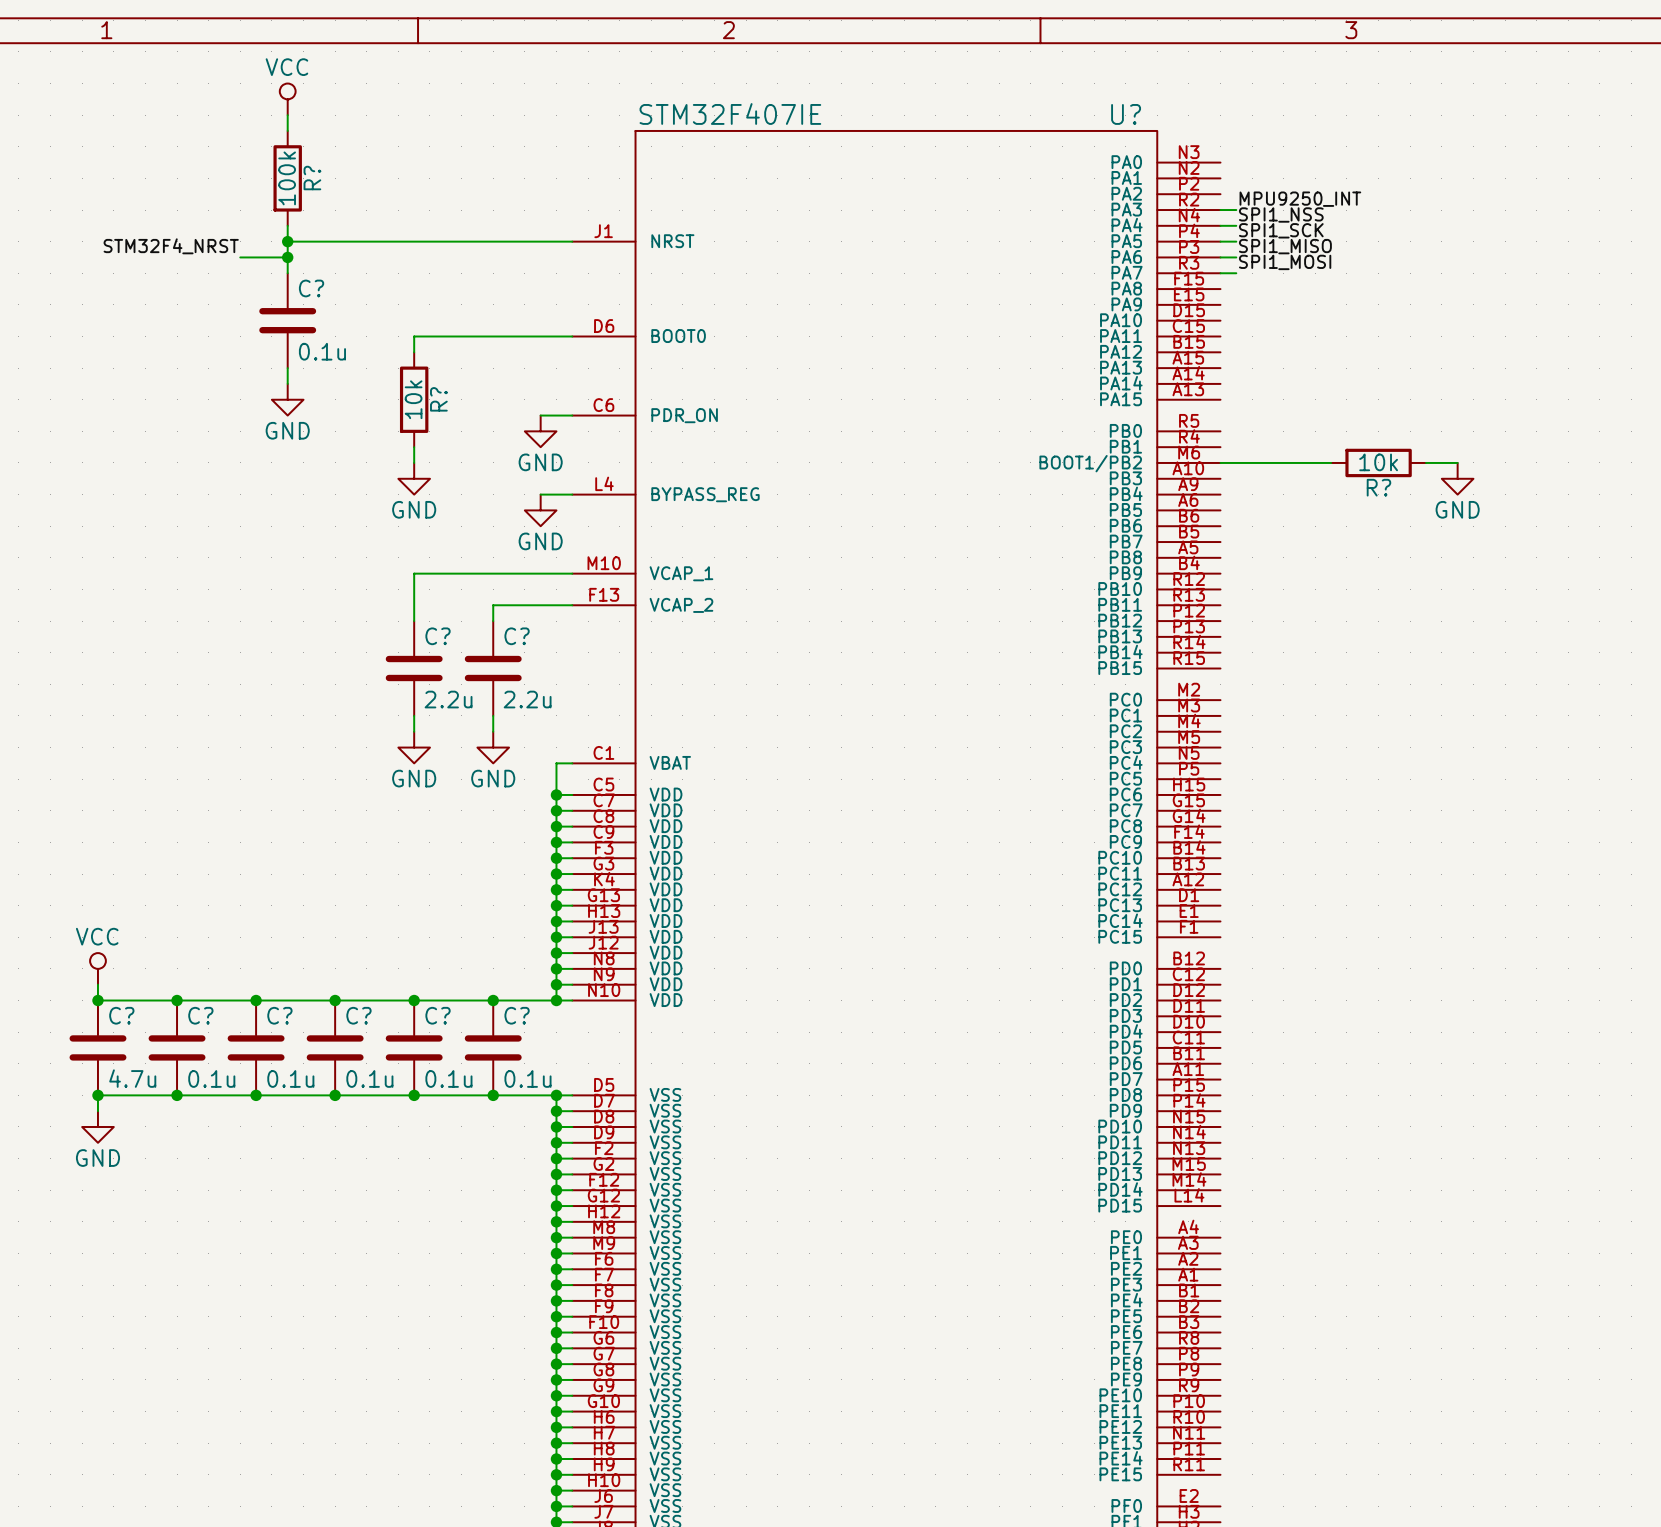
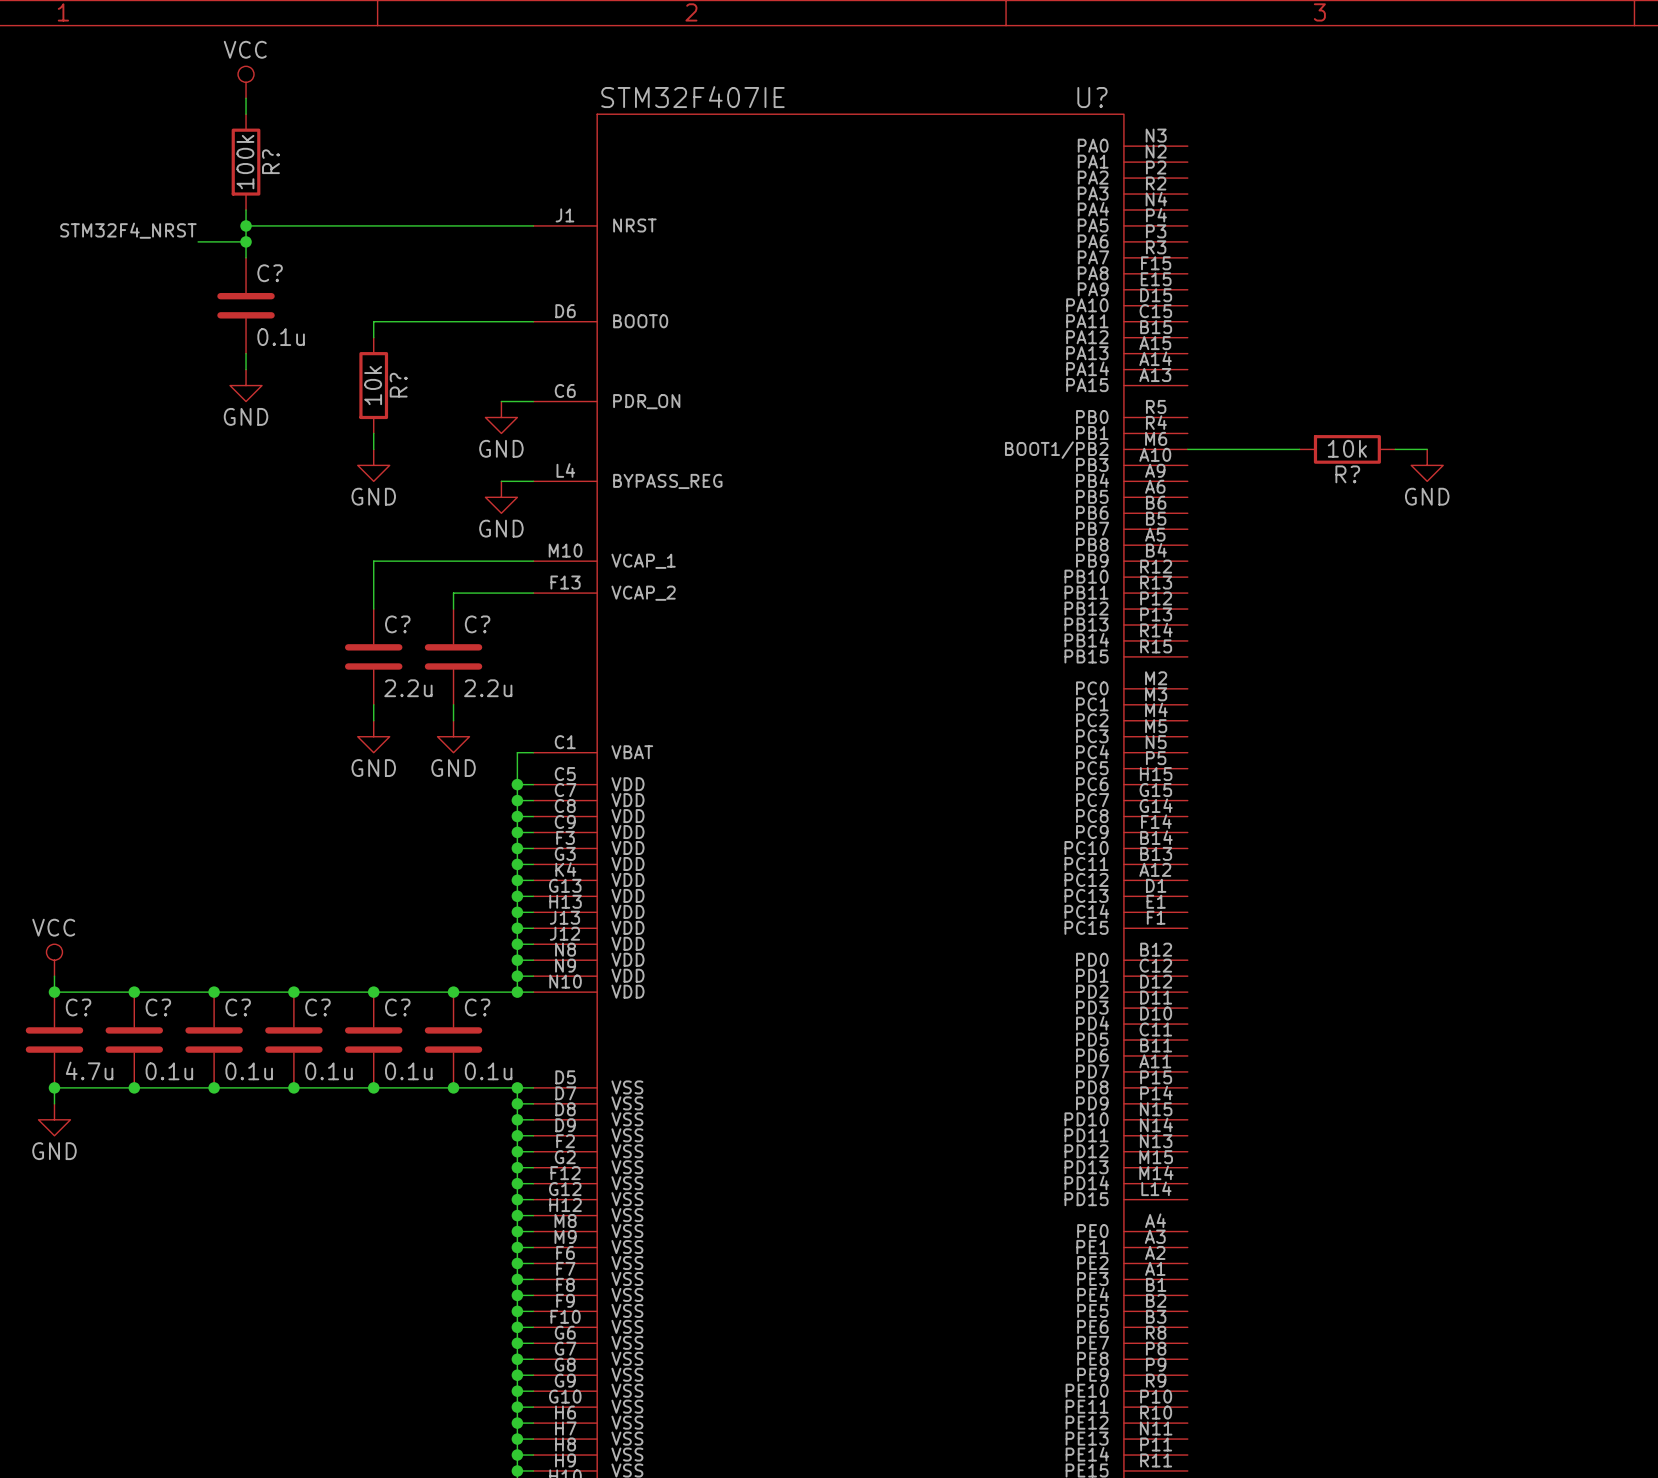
label: MPU9250_INT (1300, 199) -> none
wire: (1220, 210) (1236, 210) -> none
label: SPI1_NSS (1281, 214) -> none
wire: (1220, 225) (1236, 225) -> none
label: SPI1_SCK (1281, 230) -> none
wire: (1220, 241) (1236, 241) -> none
label: SPI1_MISO (1285, 246) -> none
wire: (1220, 257) (1236, 257) -> none
label: SPI1_MOSI (1285, 262) -> none
wire: (1220, 273) (1236, 273) -> none

